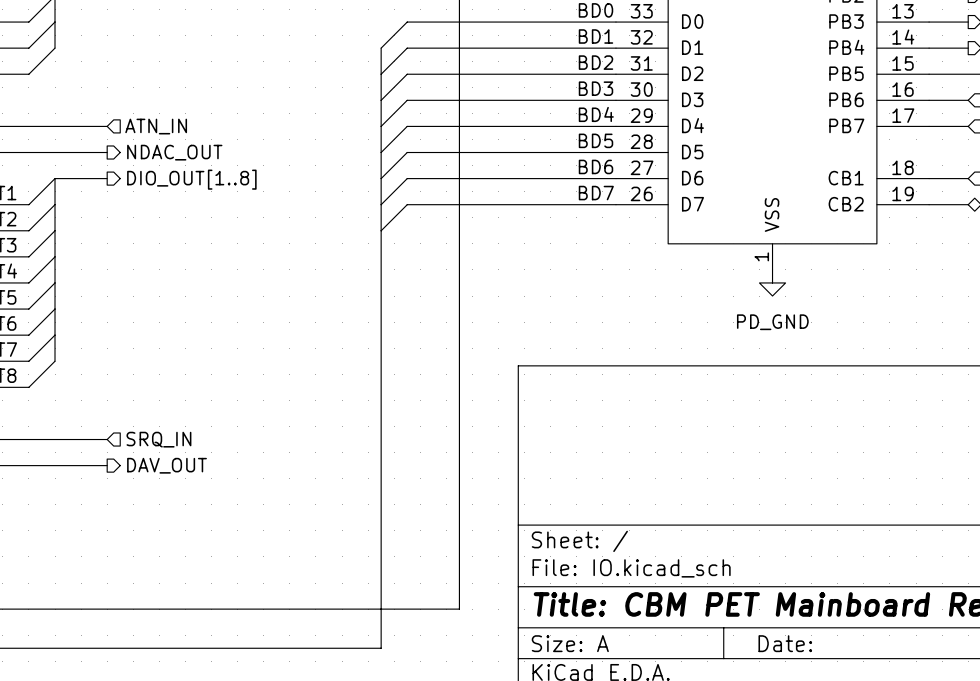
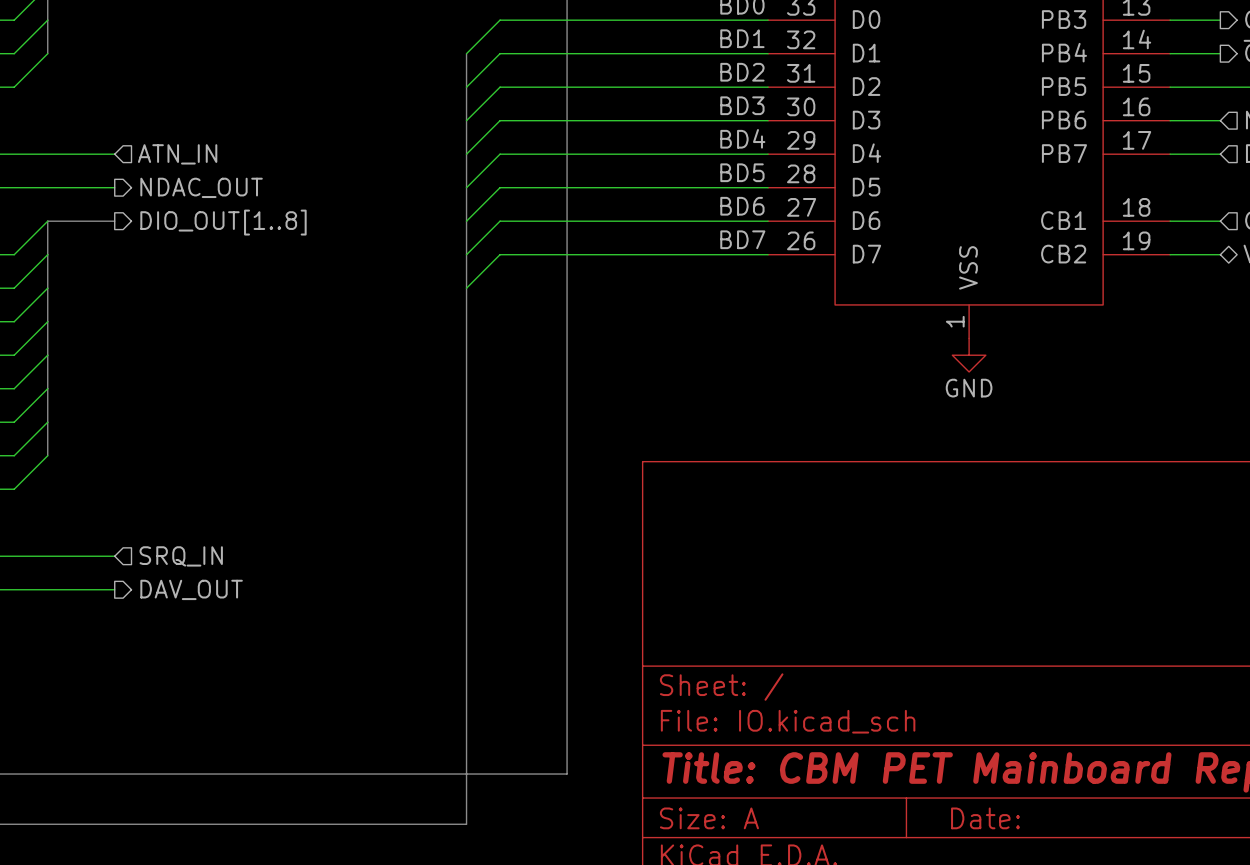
power symbol: PD_GND (772, 282) -> GND (969, 355)

